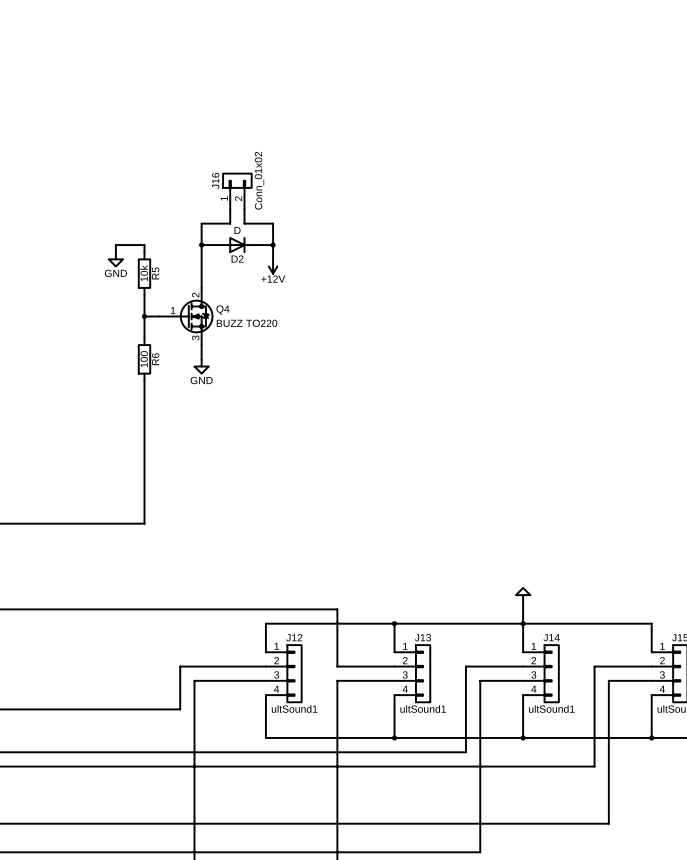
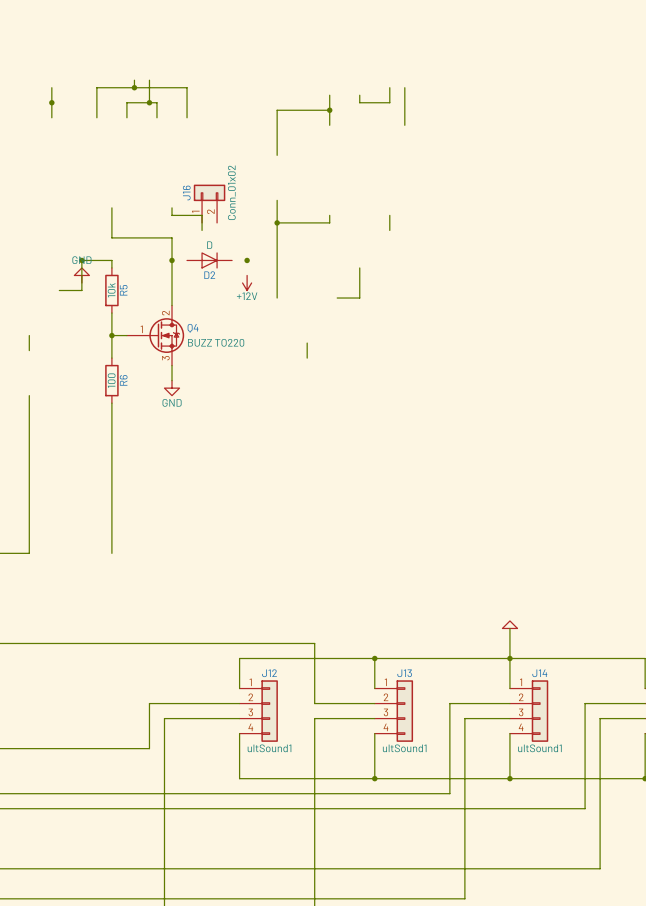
wire: none -> (134, 80) (134, 87)
wire: none -> (149, 80) (149, 102)
wire: none -> (51, 87) (51, 117)
junction: none -> (134, 87)
wire: none -> (389, 87) (389, 102) (359, 102) (359, 95)
wire: none -> (404, 87) (404, 125)
wire: none -> (329, 95) (329, 125)
junction: none -> (51, 102)
junction: none -> (149, 102)
wire: none -> (329, 110) (277, 110) (277, 155)
junction: none -> (329, 110)
wire: none -> (96, 117) (96, 87) (187, 87) (187, 117)
wire: none -> (126, 117) (126, 102) (156, 102) (156, 117)
wire: none -> (277, 200) (277, 298)
wire: none -> (172, 207) (172, 215) (202, 215) (202, 222)
wire: none -> (329, 215) (329, 222) (277, 222)
wire: none -> (389, 215) (389, 230)
wire: (244, 209) (244, 223) (273, 223) (273, 259) -> none
junction: none -> (277, 222)
wire: (230, 216) (230, 223) (201, 223) -> (111, 207) (111, 237) (172, 237)
junction: none -> (81, 260)
wire: (201, 245) (215, 245) -> none
wire: (258, 245) (273, 245) -> none
wire: none -> (81, 267) (81, 290) (59, 290)
wire: none -> (359, 267) (359, 298) (337, 298)
power symbol rotation: 0° (115, 259) -> 180° (81, 275)
wire: none -> (29, 335) (29, 350)
wire: none -> (307, 343) (307, 358)
wire: (65, 523) (144, 523) -> (29, 553) (29, 395)

